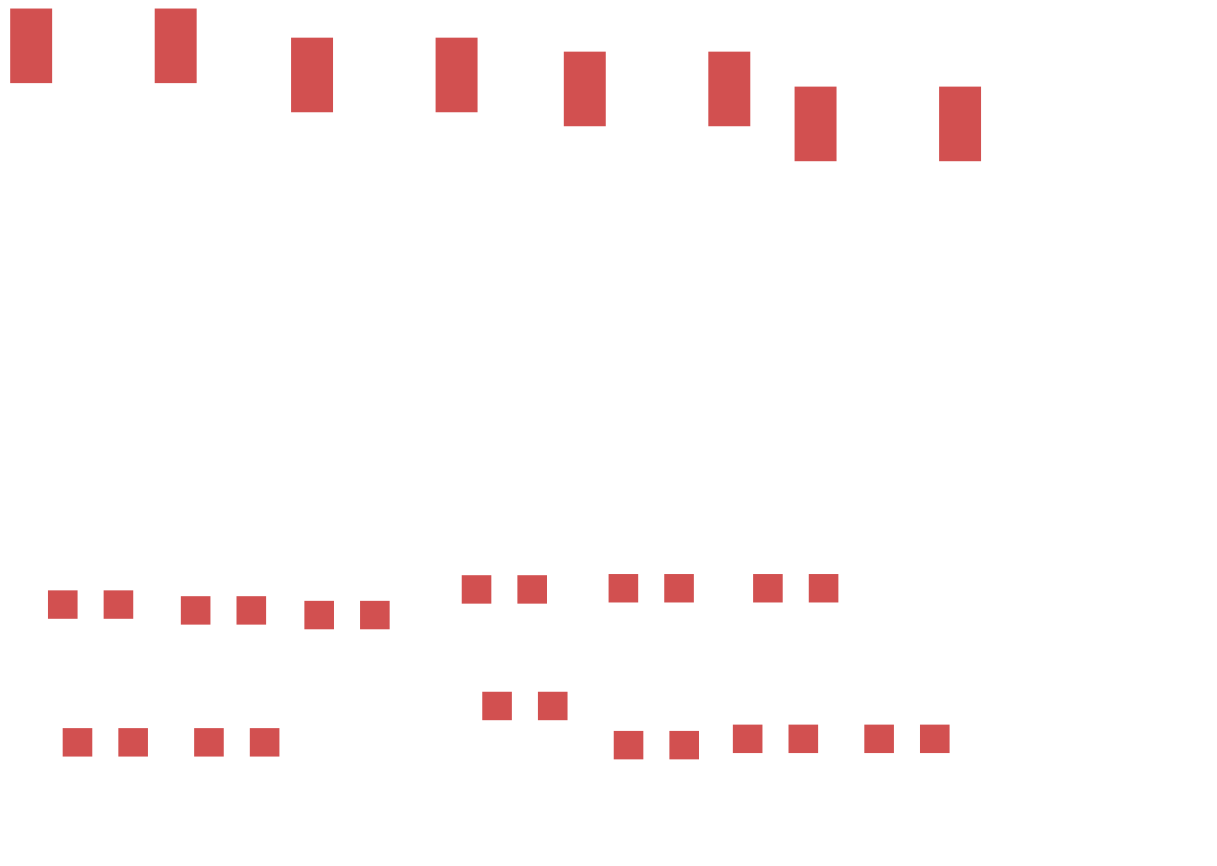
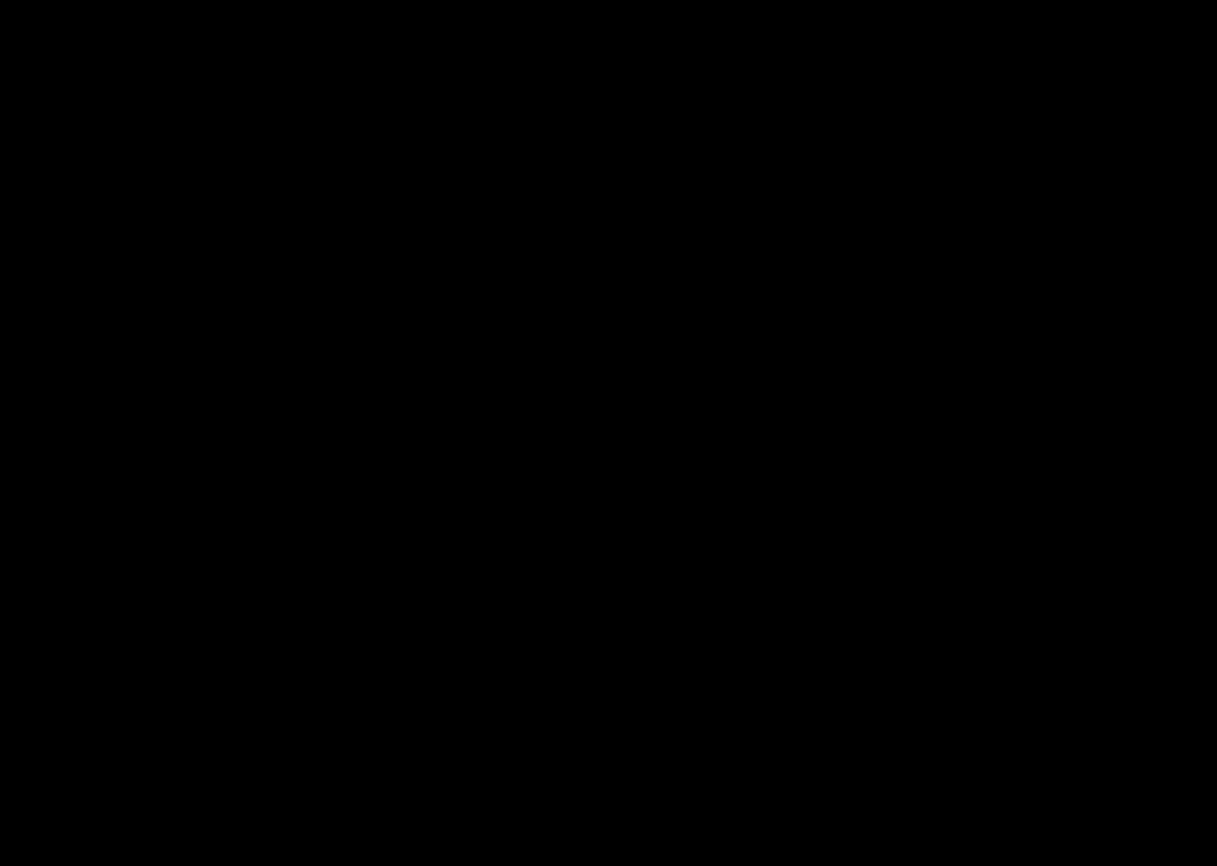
part: (103, 45) -> none
part: (384, 74) -> none
part: (657, 88) -> none
part: (887, 123) -> none
part: (651, 588) -> none
part: (795, 588) -> none
part: (504, 589) -> none
part: (90, 604) -> none
part: (223, 610) -> none
part: (347, 615) -> none
part: (524, 705) -> none
part: (775, 738) -> none
part: (906, 738) -> none
part: (105, 742) -> none
part: (236, 742) -> none
part: (656, 745) -> none

